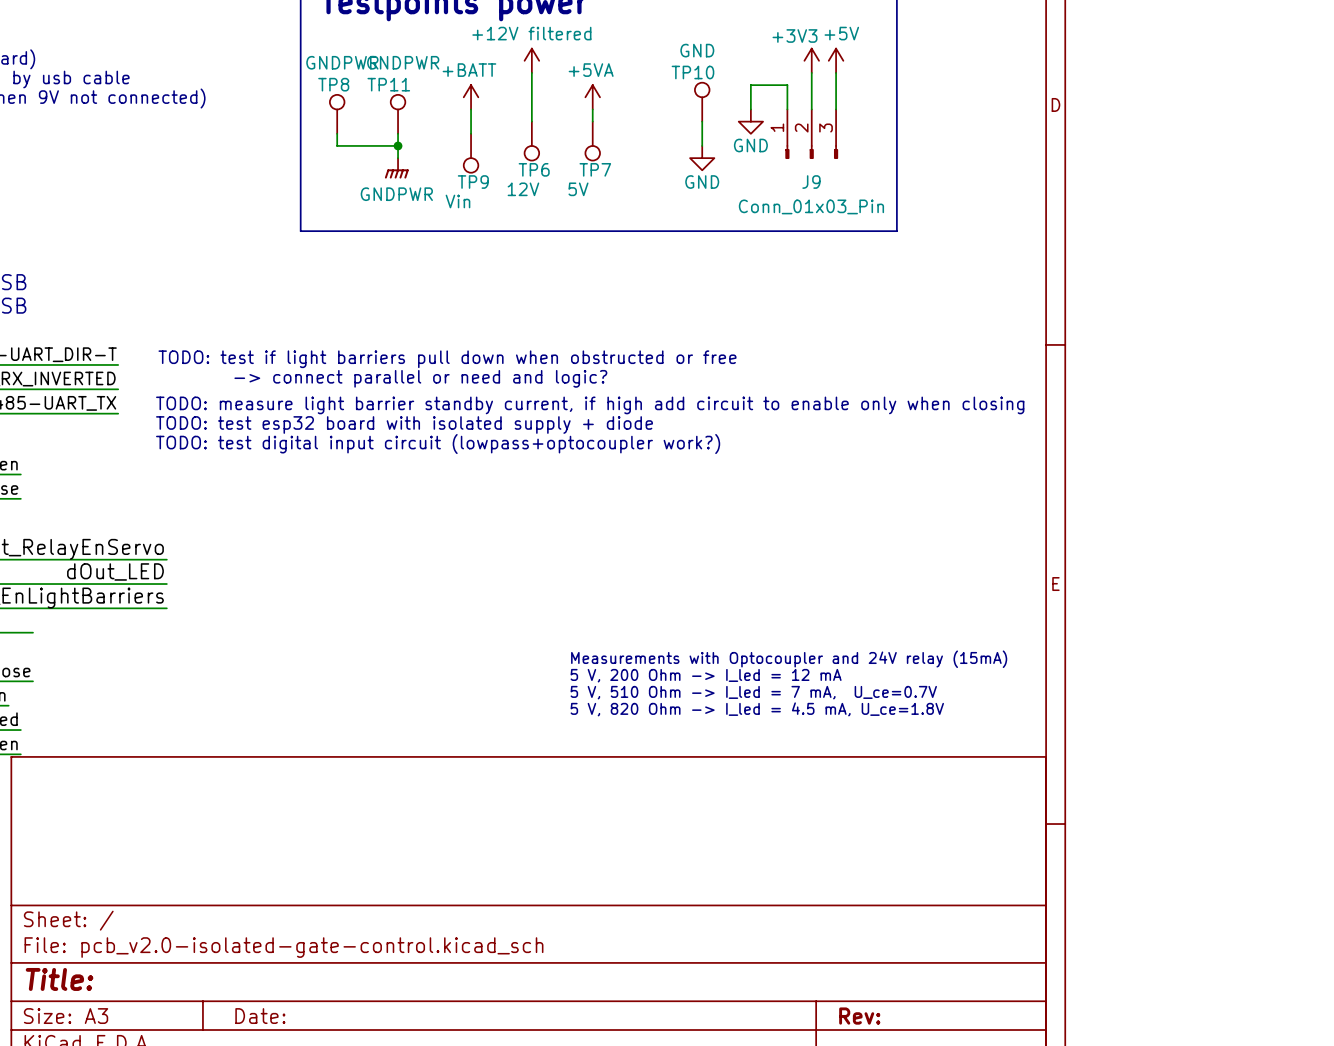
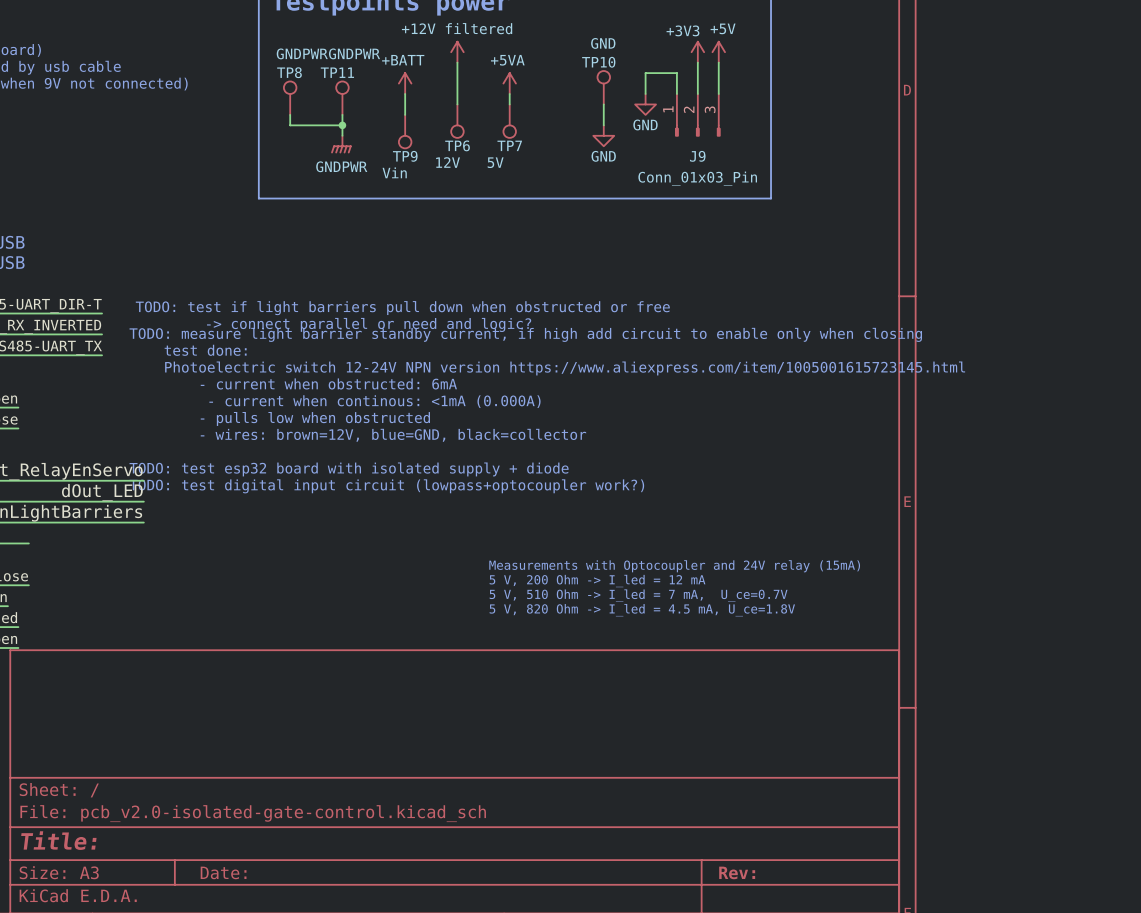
text position: TODO: measure light barrier standby current, if high add circuit to enable only when closing (590, 405) -> TODO: measure light barrier standby current, if high add circuit to enable only when closing (525, 334)
text: none -> test done: (205, 350)
text position: TODO: test esp32 board with isolated supply + diode (404, 425) -> TODO: test esp32 board with isolated supply + diode (349, 469)
text: none -> Photoelectric switch 12-24V NPN version https://www.aliexpress.com/item/1005001615723145.html (565, 368)
text position: TODO: test digital input circuit (lowpass+optocoupler work?) (438, 444) -> TODO: test digital input circuit (lowpass+optocoupler work?) (386, 486)
text: none -> - current when obstructed: 6mA (328, 383)
text: none -> - current when continous: <1mA (0.000A) (374, 401)
text: none -> - pulls low when obstructed (315, 418)
text: none -> - wires: brown=12V, blue=GND, black=collector (393, 435)

